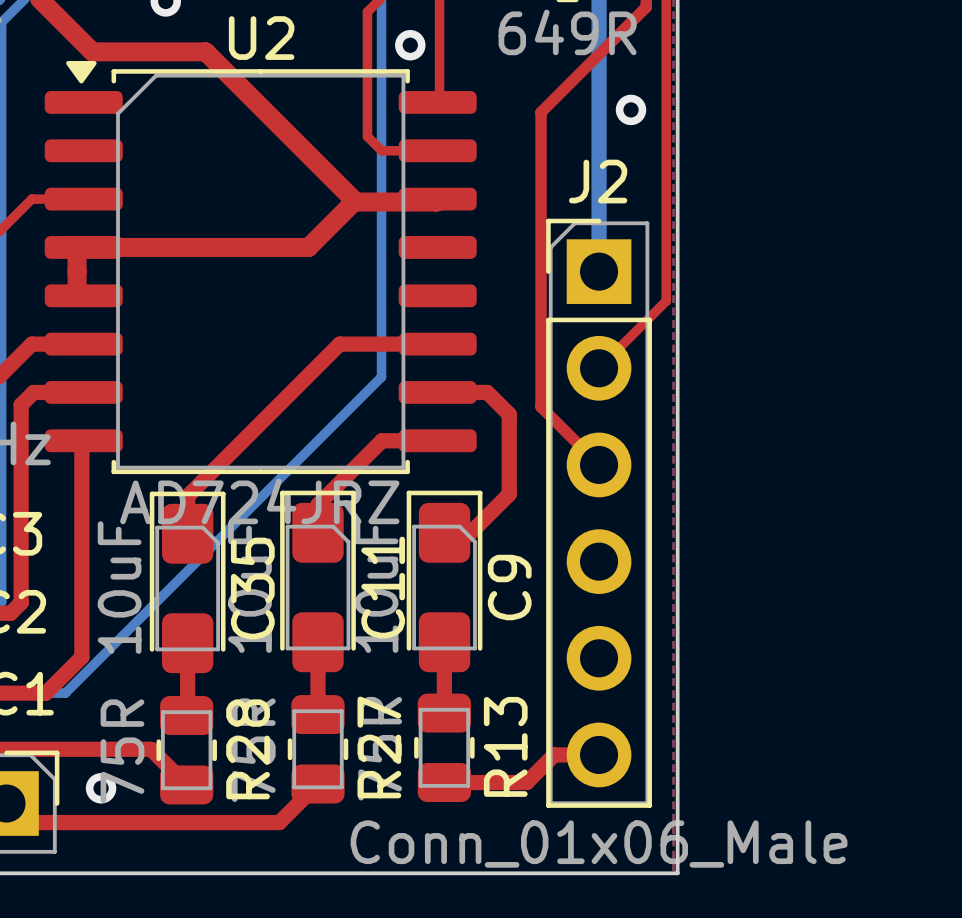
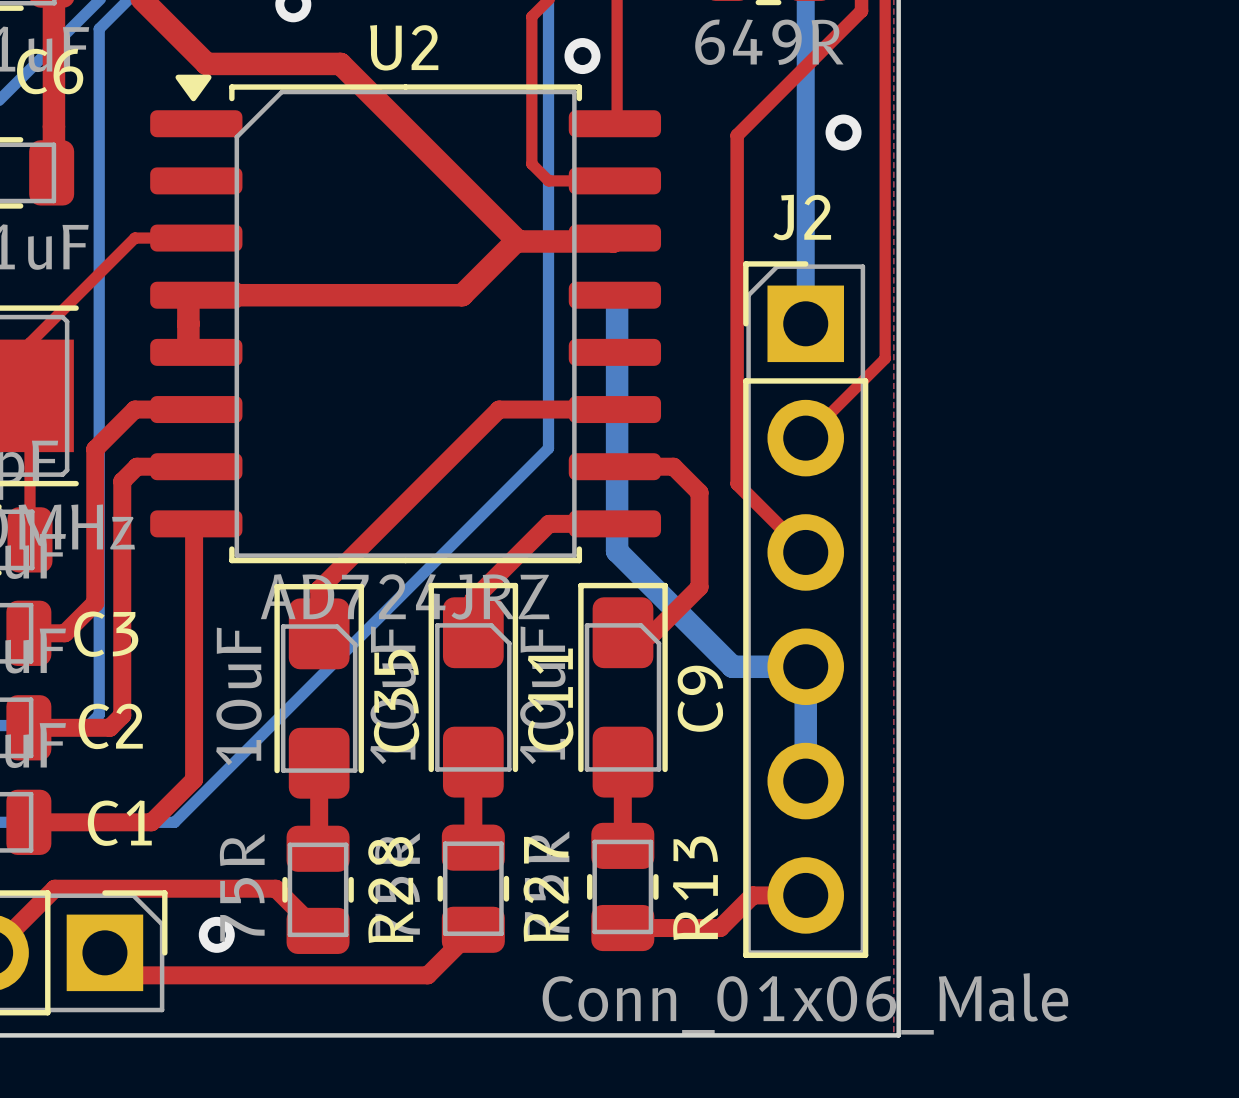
bottom track: none -> (617, 295) (617, 551) (732, 666) (805, 666) (805, 781)

